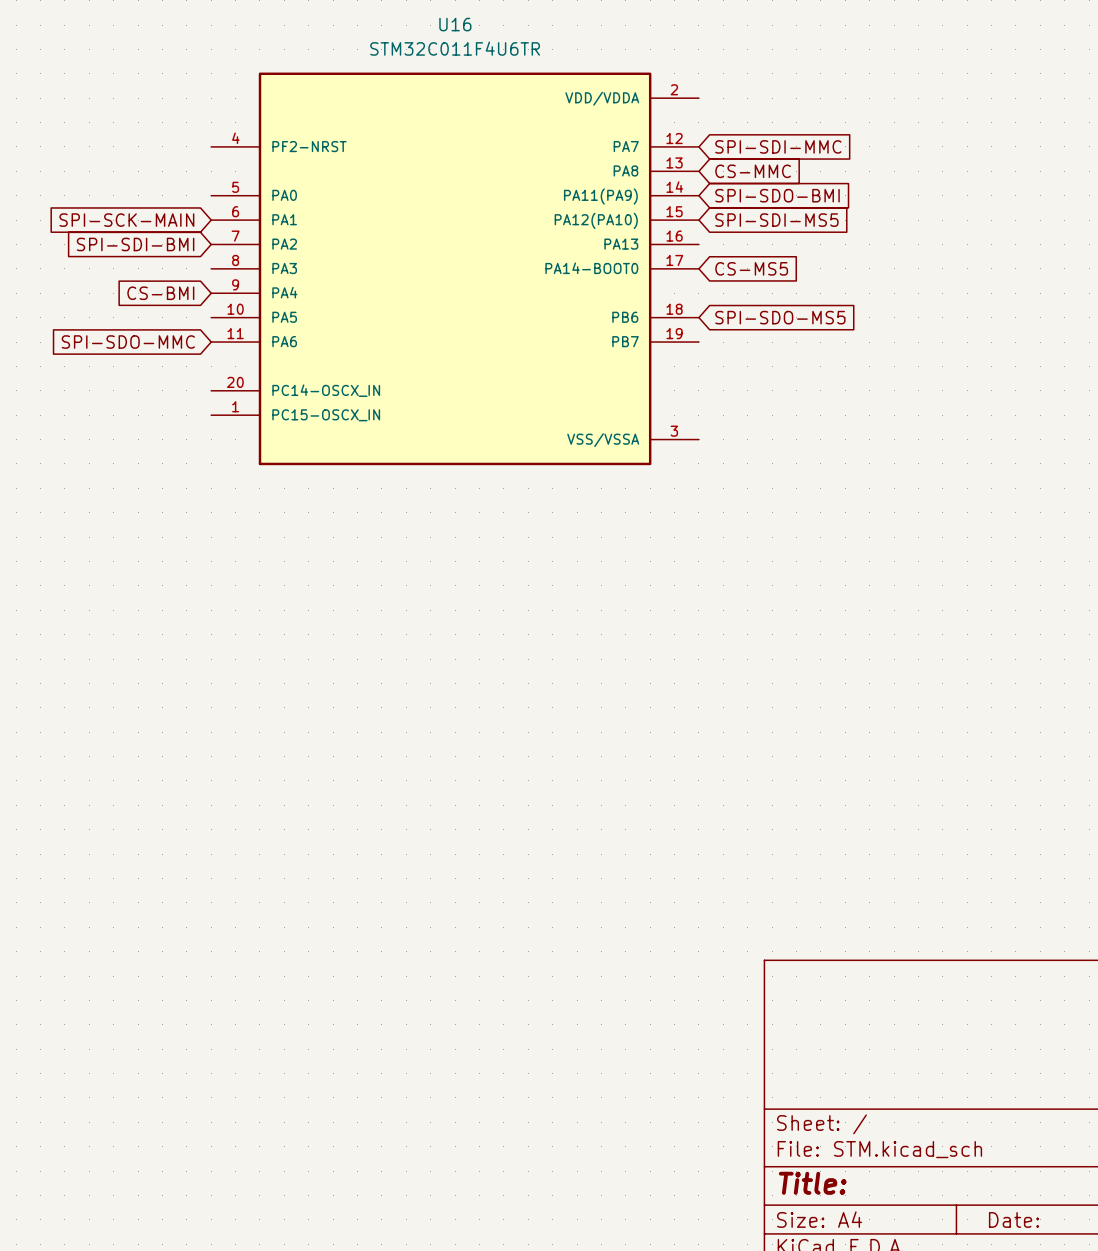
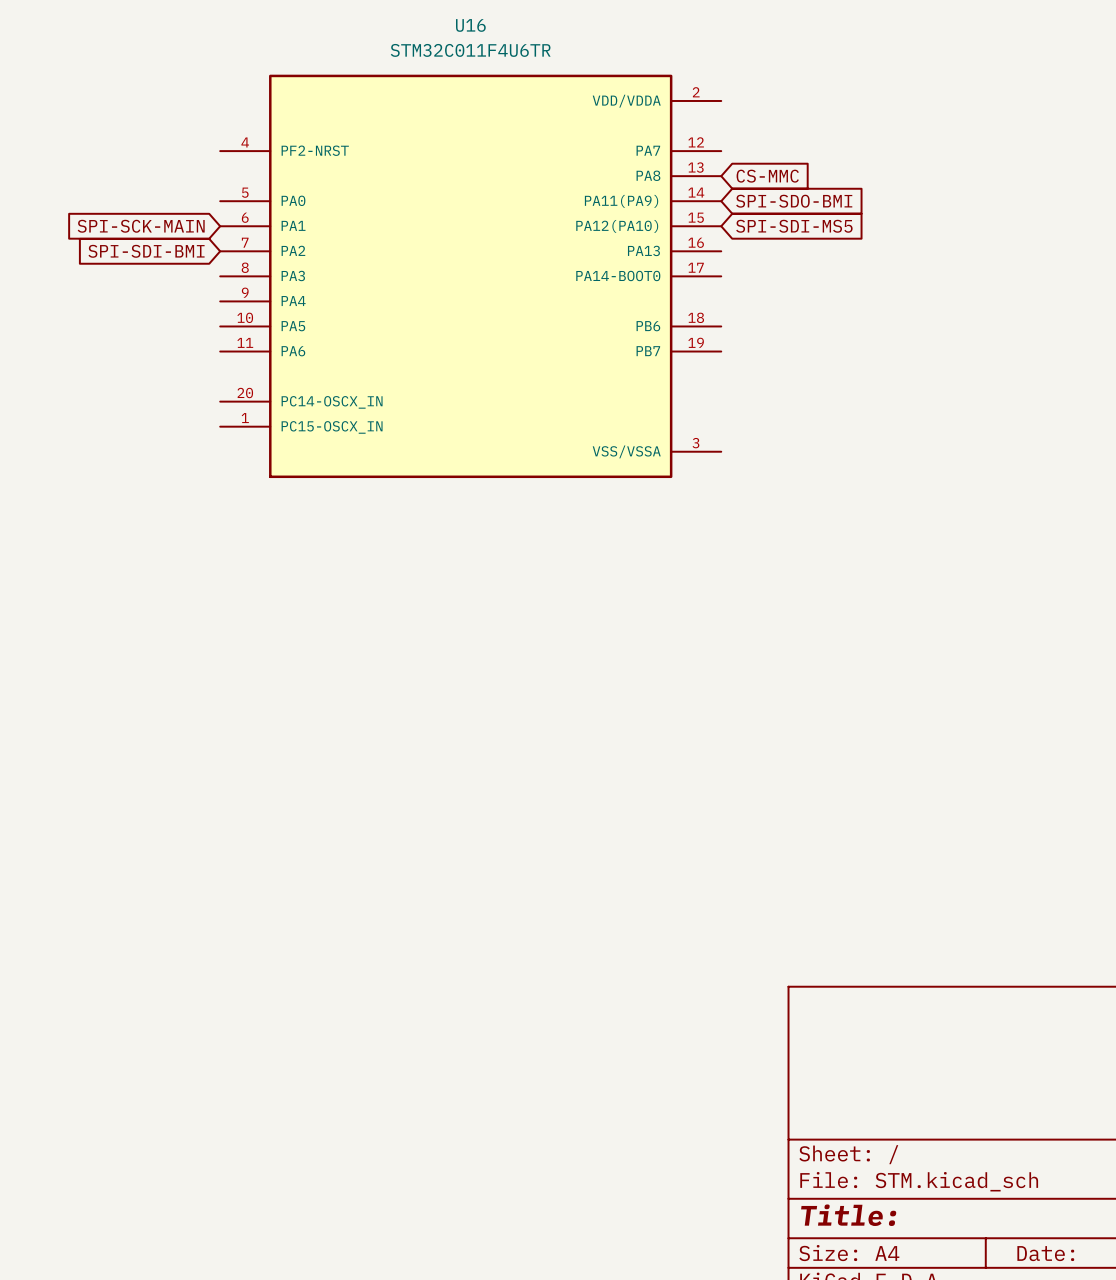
global label: SPI-SDI-MMC (778, 146) -> none
global label: CS-MS5 (751, 268) -> none
global label: CS-BMI (160, 293) -> none
global label: SPI-SDO-MS5 (780, 317) -> none
global label: SPI-SDO-MMC (128, 342) -> none

